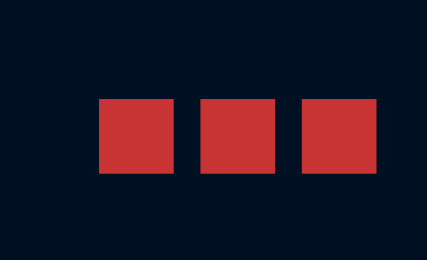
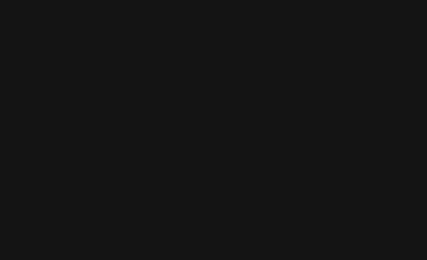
part: (237, 136) -> none

